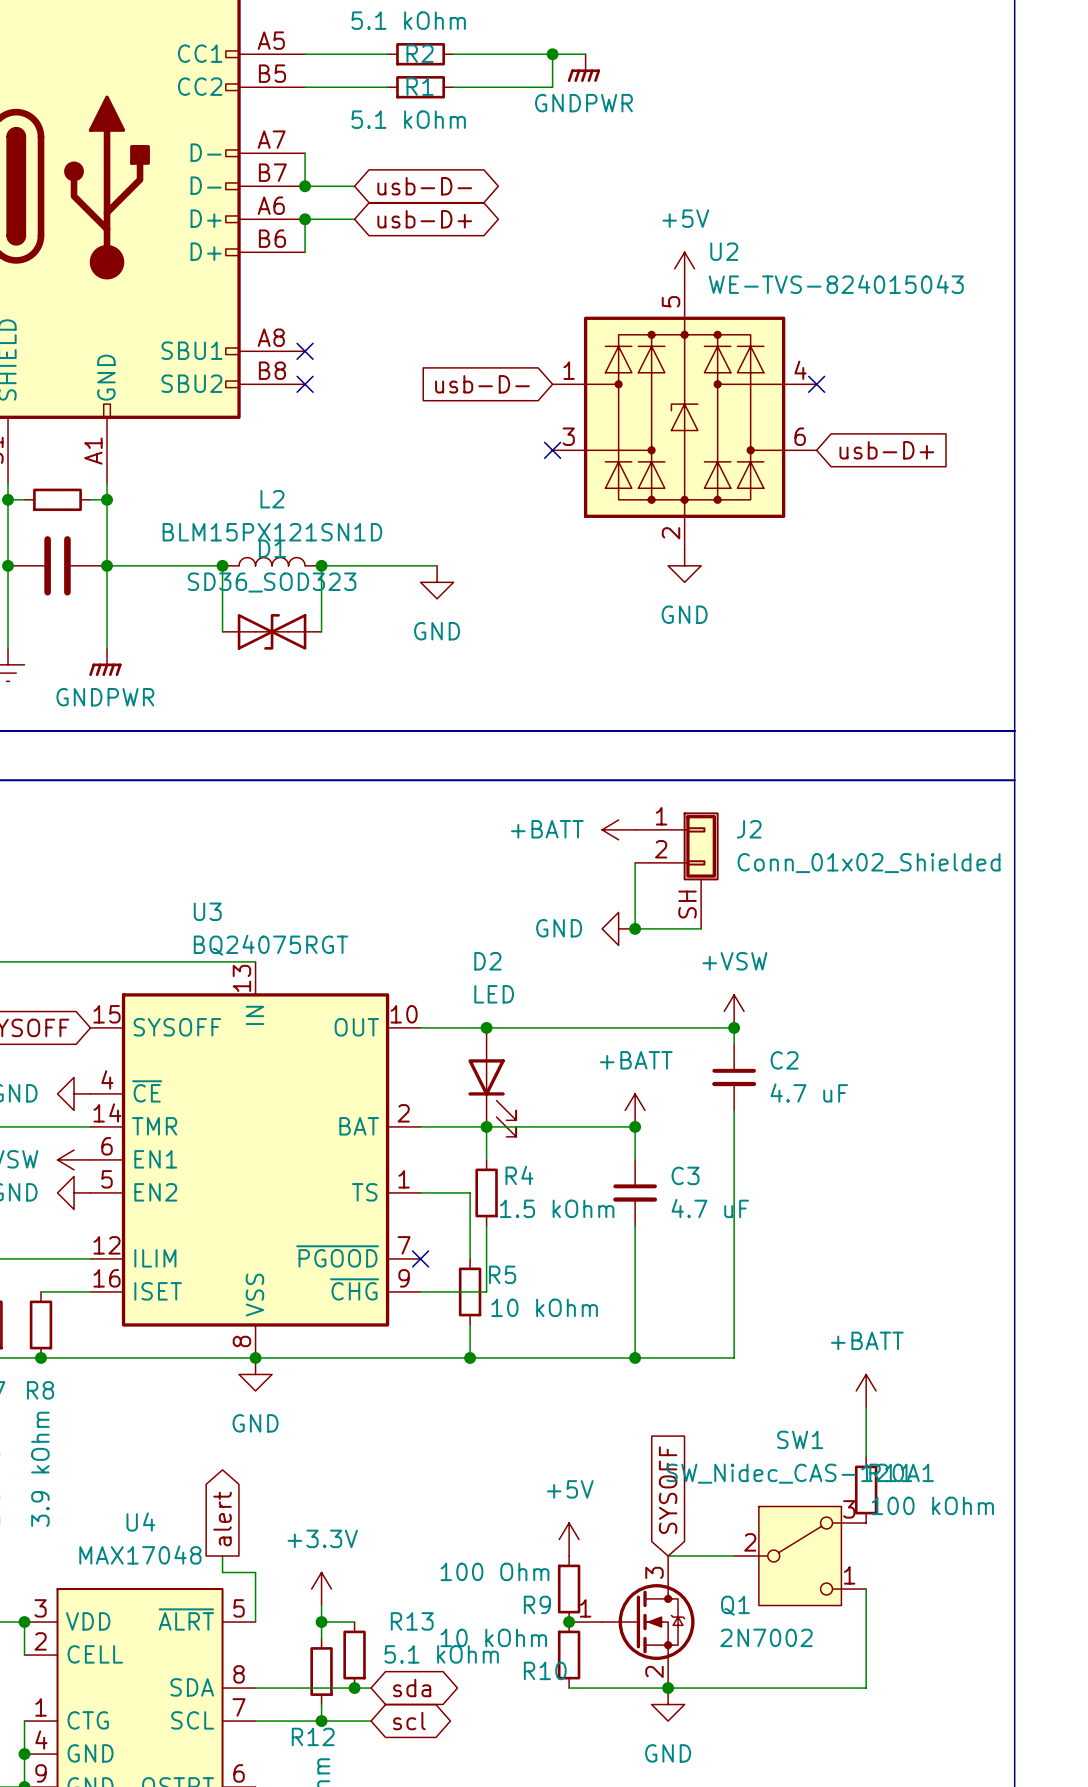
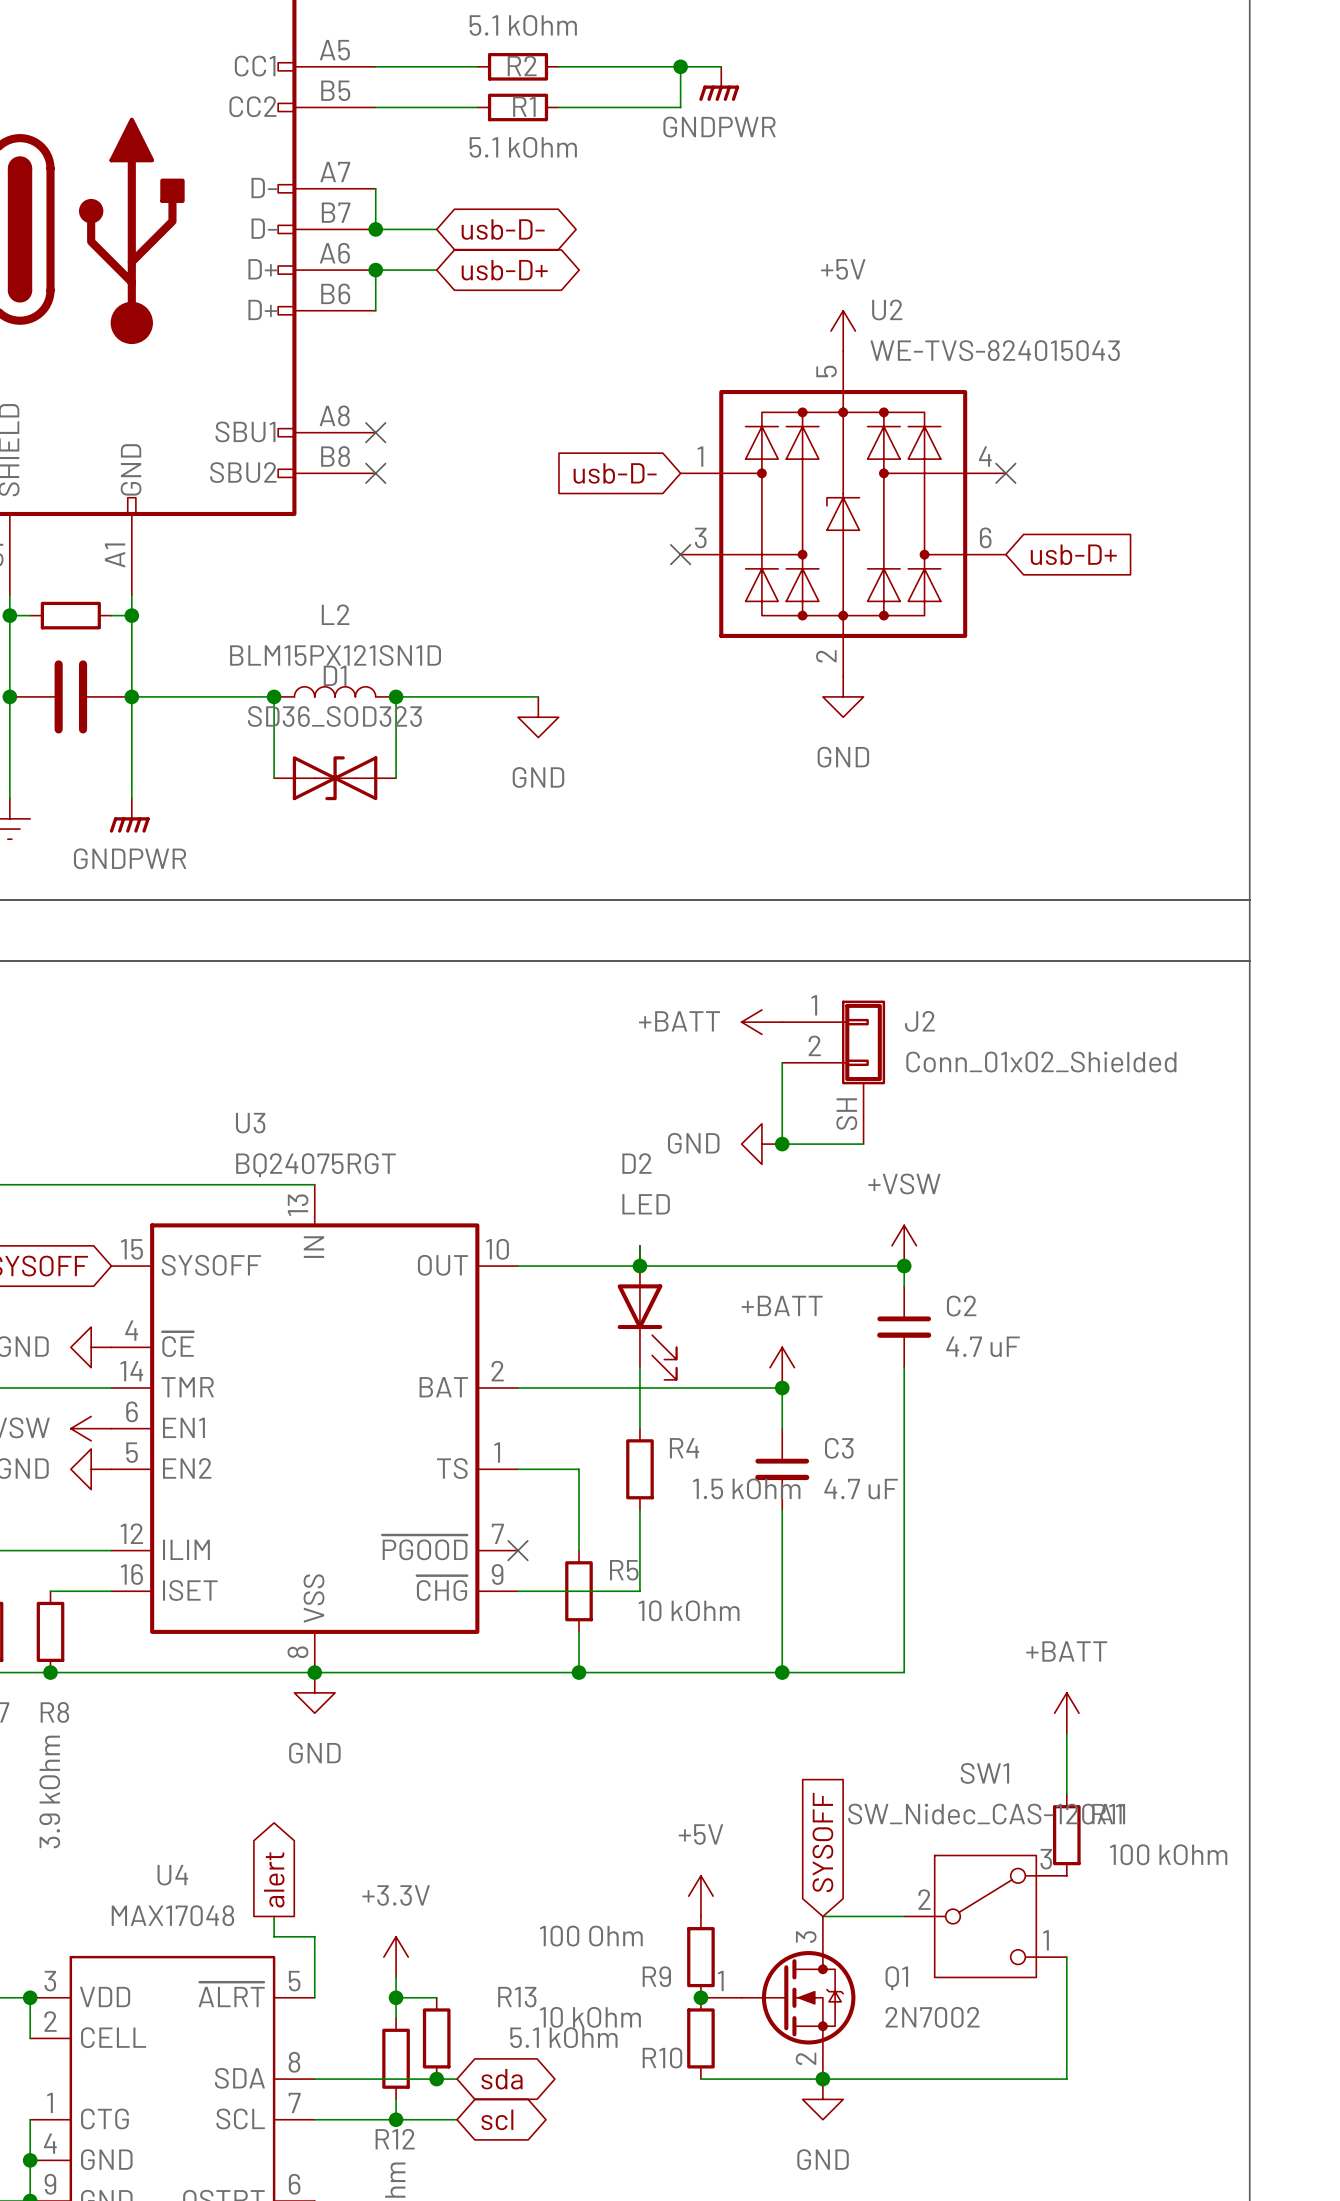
wire: none -> (639, 1245) (639, 1266)
junction position: (486, 1027) -> (639, 1266)
D2 position: (492, 1082) -> (647, 1312)
wire: none -> (639, 1367) (639, 1428)
wire: (486, 1126) (486, 1159) -> none
junction: (486, 1126) -> none
R4 position: (486, 1192) -> (639, 1469)
wire: (486, 1225) (486, 1291) -> (639, 1509) (639, 1591) (599, 1591)

